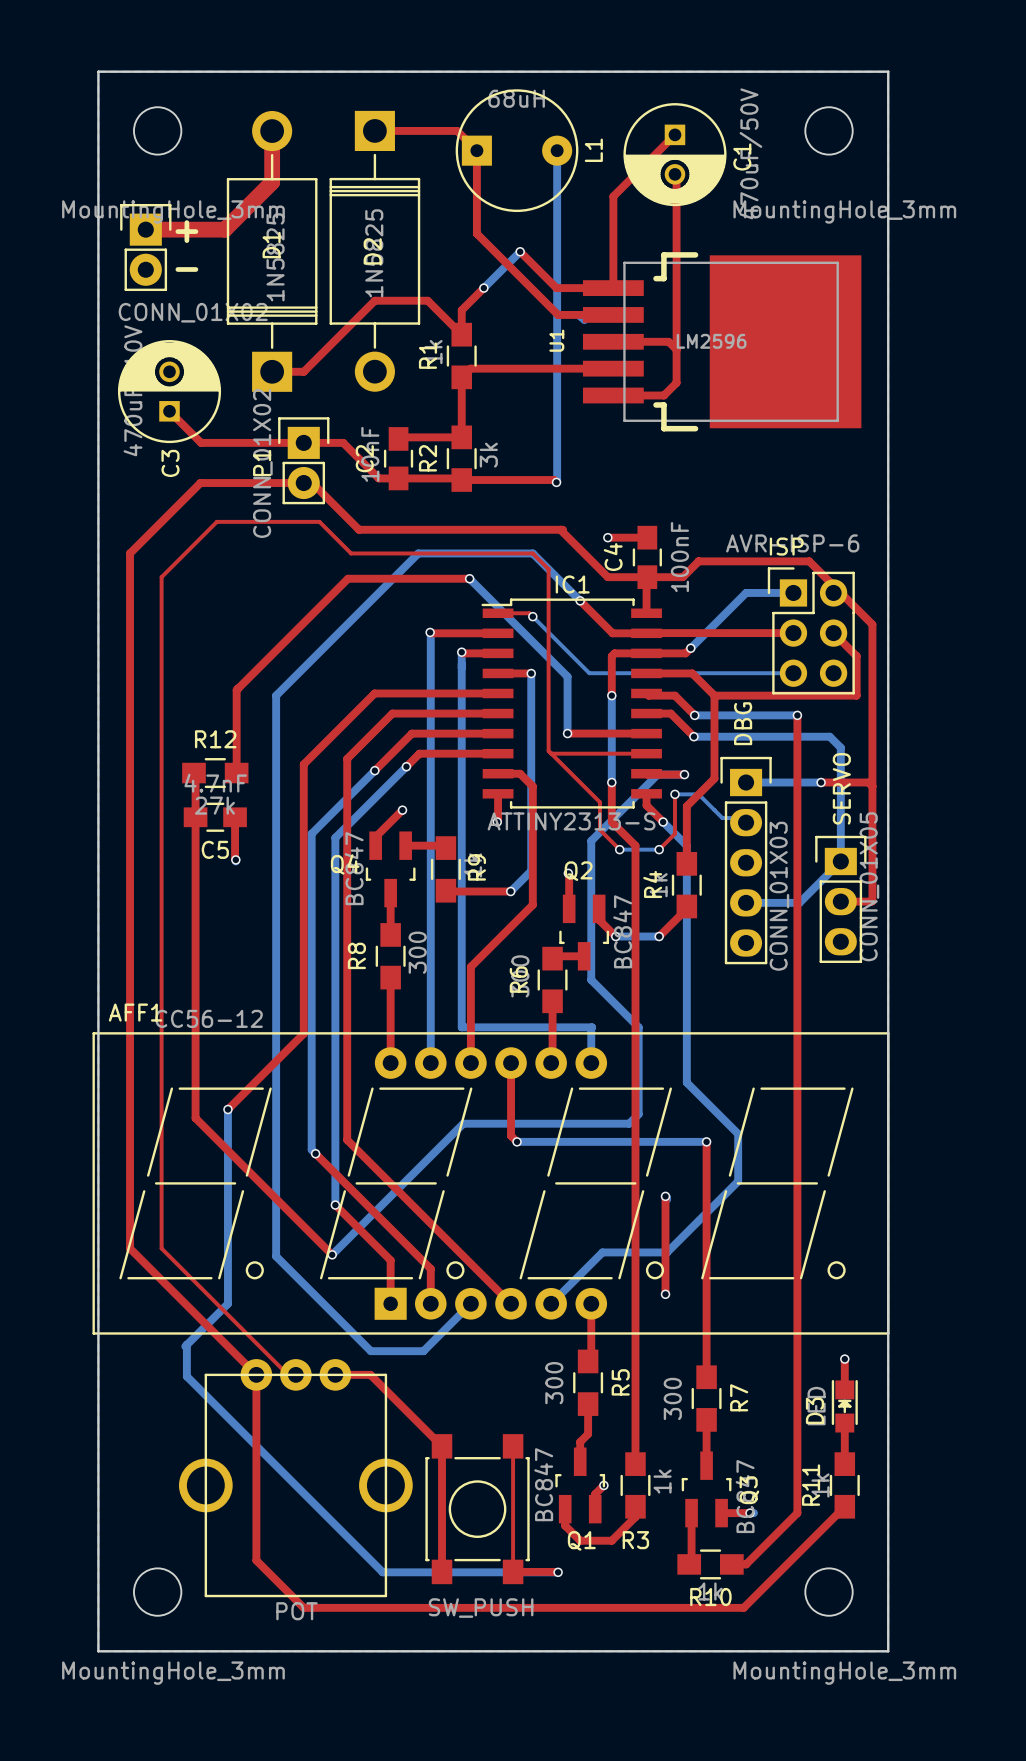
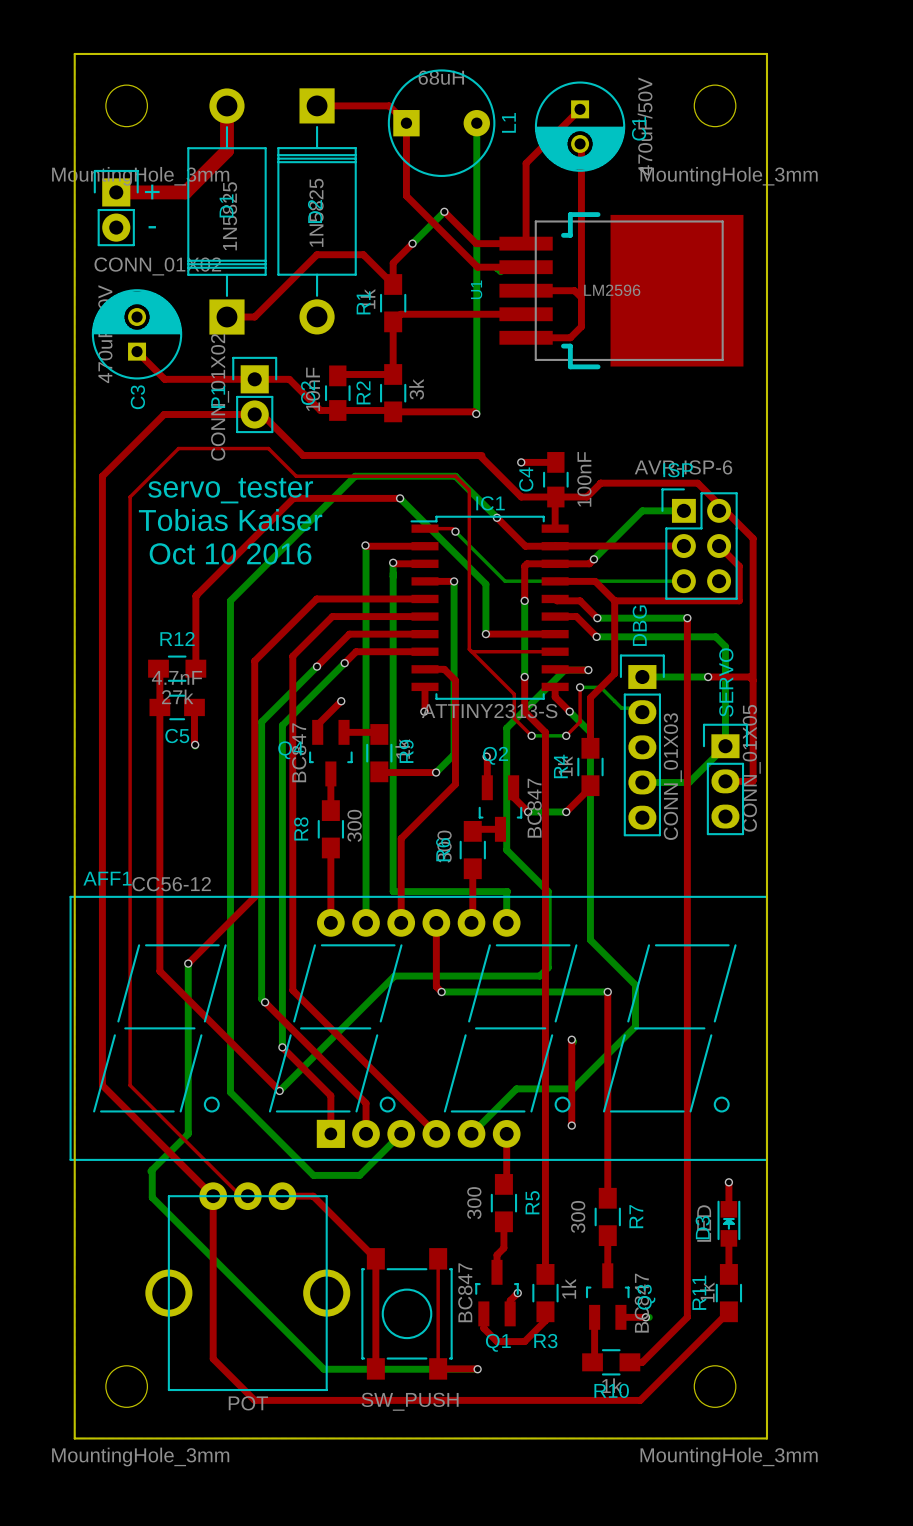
text: none -> servo_tester (230, 490)
text: none -> Tobias Kaiser (230, 520)
text: none -> Oct 10 2016 (230, 553)

